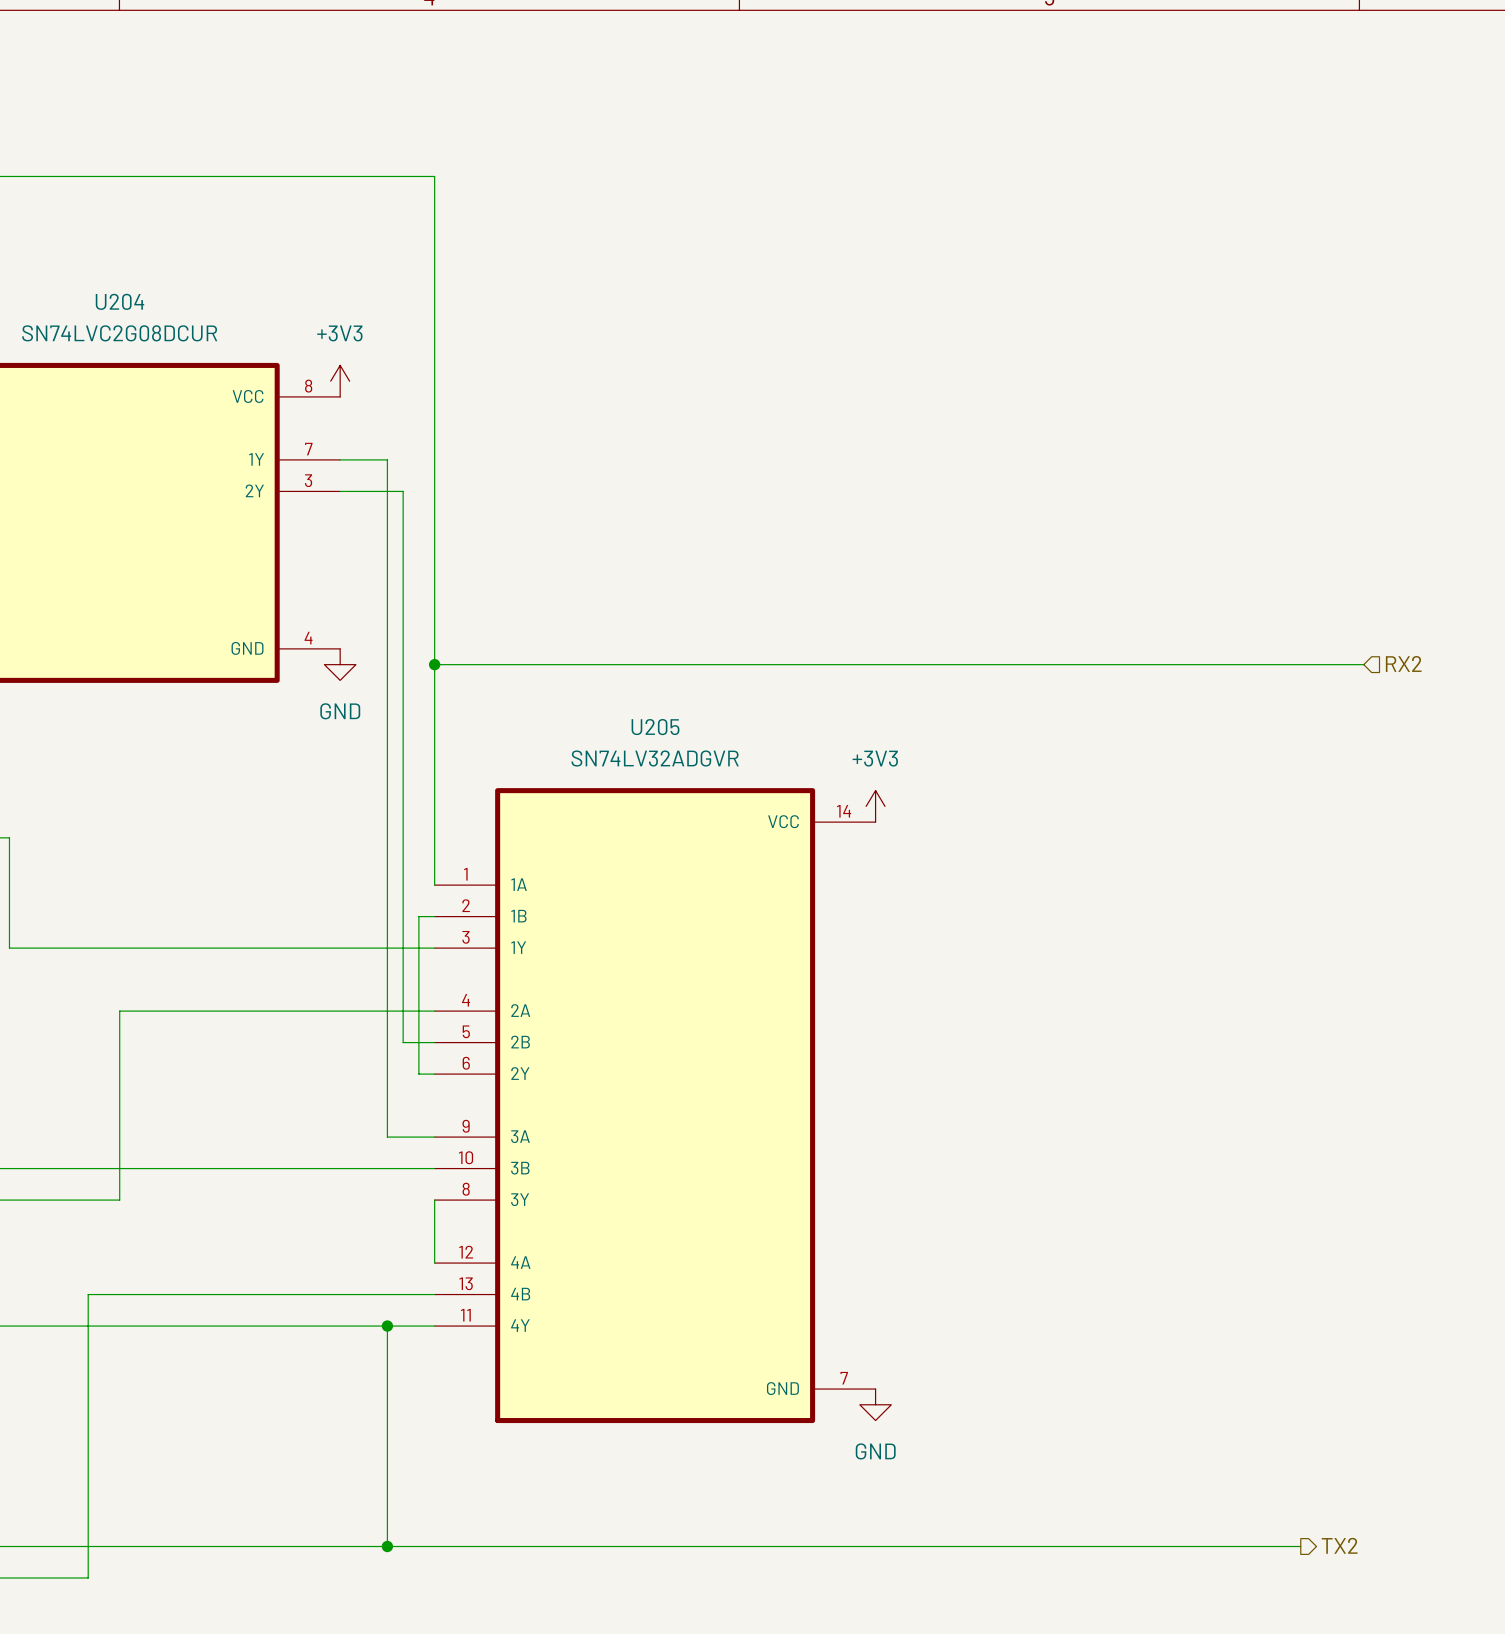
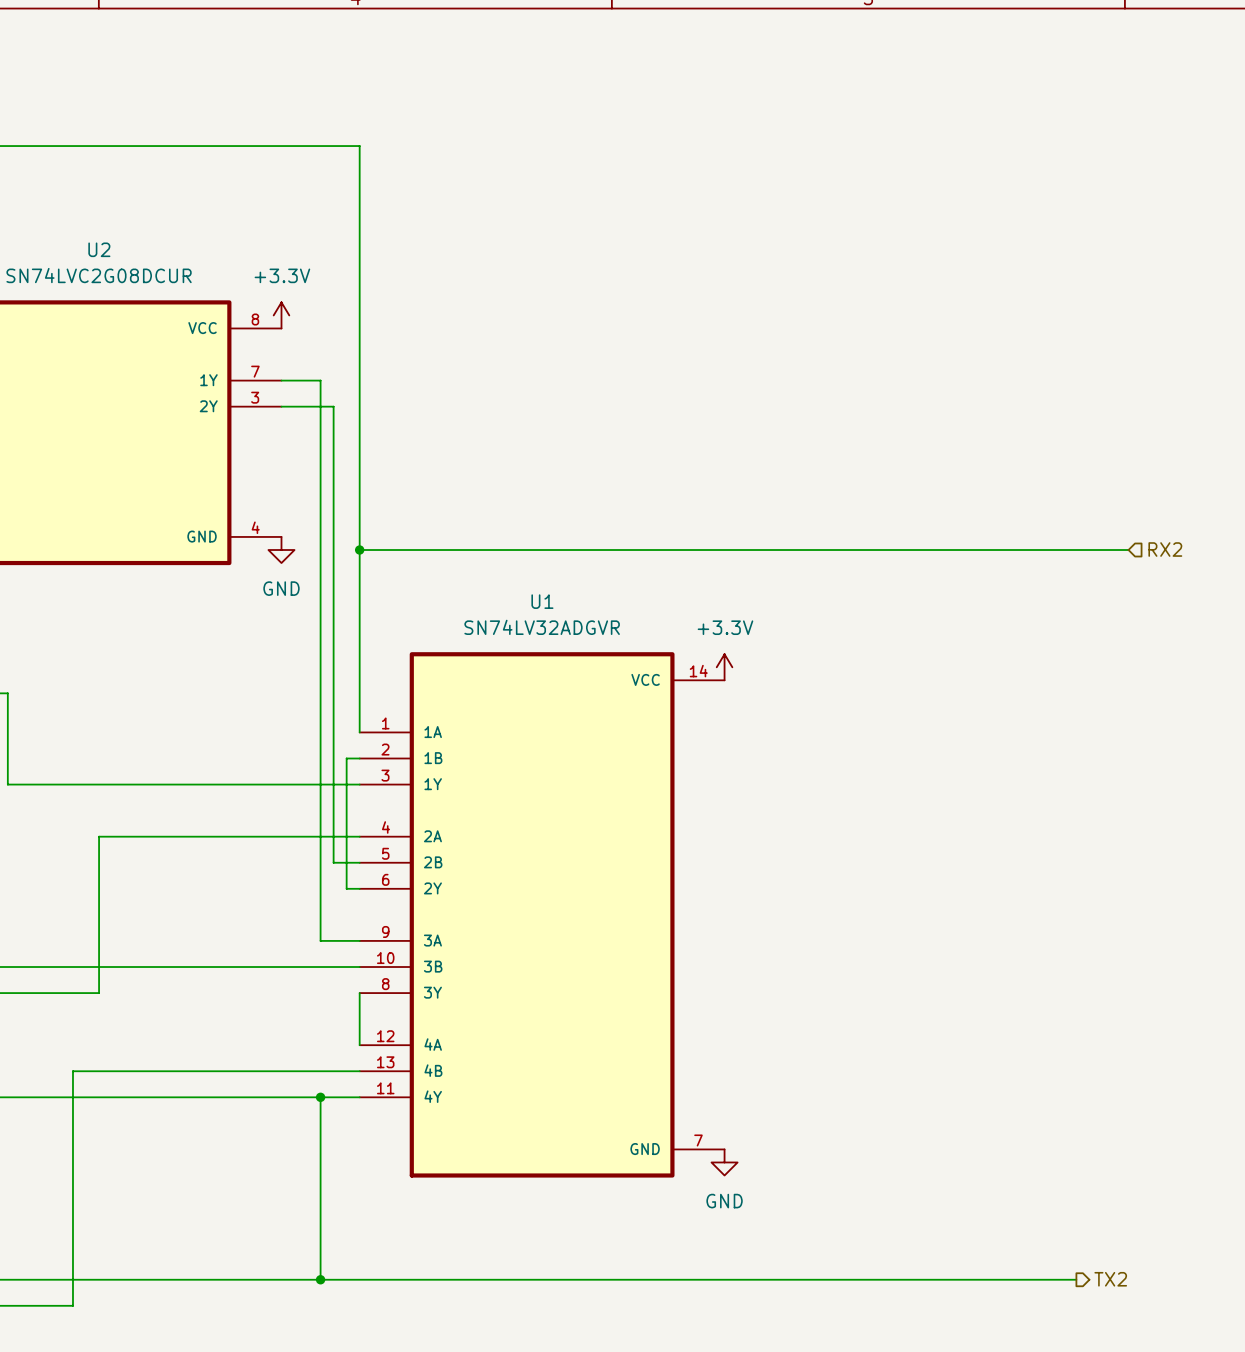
U204 name: U204 (119, 301) -> U2 (99, 249)
power symbol: +3V3 (340, 381) -> +3.3V (281, 315)
U205 name: U205 (655, 727) -> U1 (542, 601)
power symbol: +3V3 (875, 806) -> +3.3V (724, 667)

